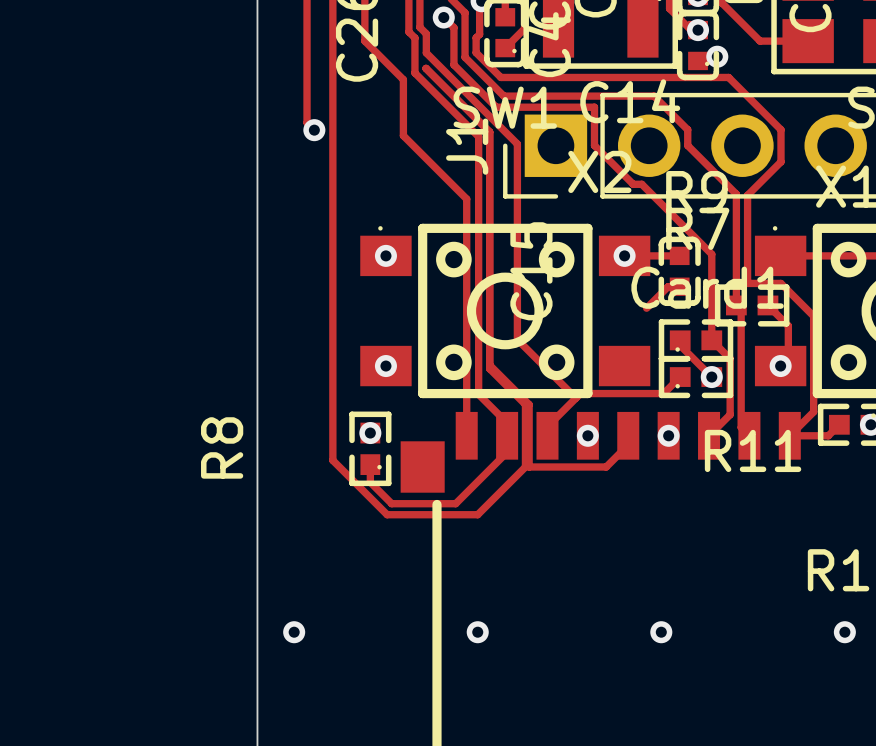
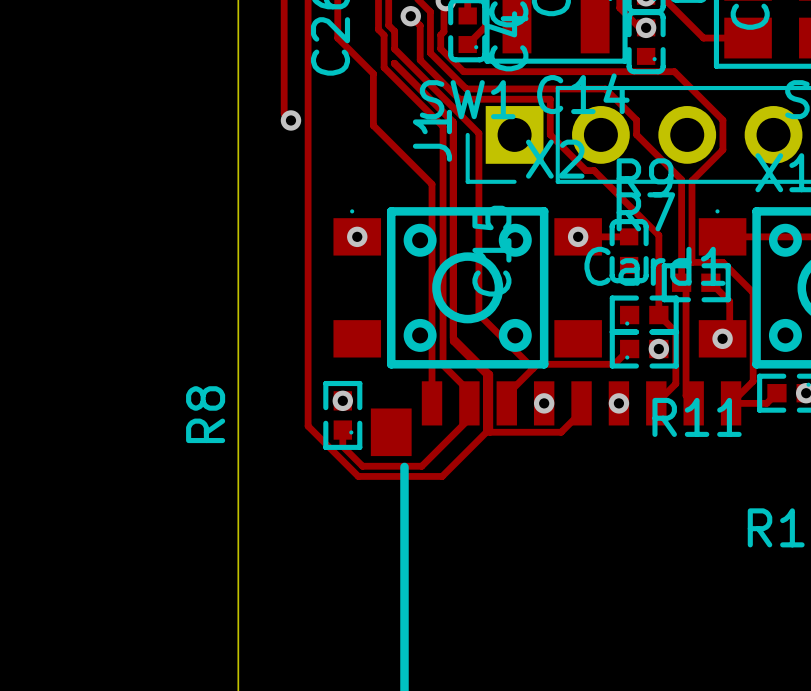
via: (717, 56) -> none
track: (679, 286) (668, 286) (646, 308) -> none
track: (680, 345) (711, 377) -> none
via: (385, 366) -> none
via: (294, 632) -> none
via: (477, 632) -> none
via: (661, 632) -> none
via: (844, 632) -> none

